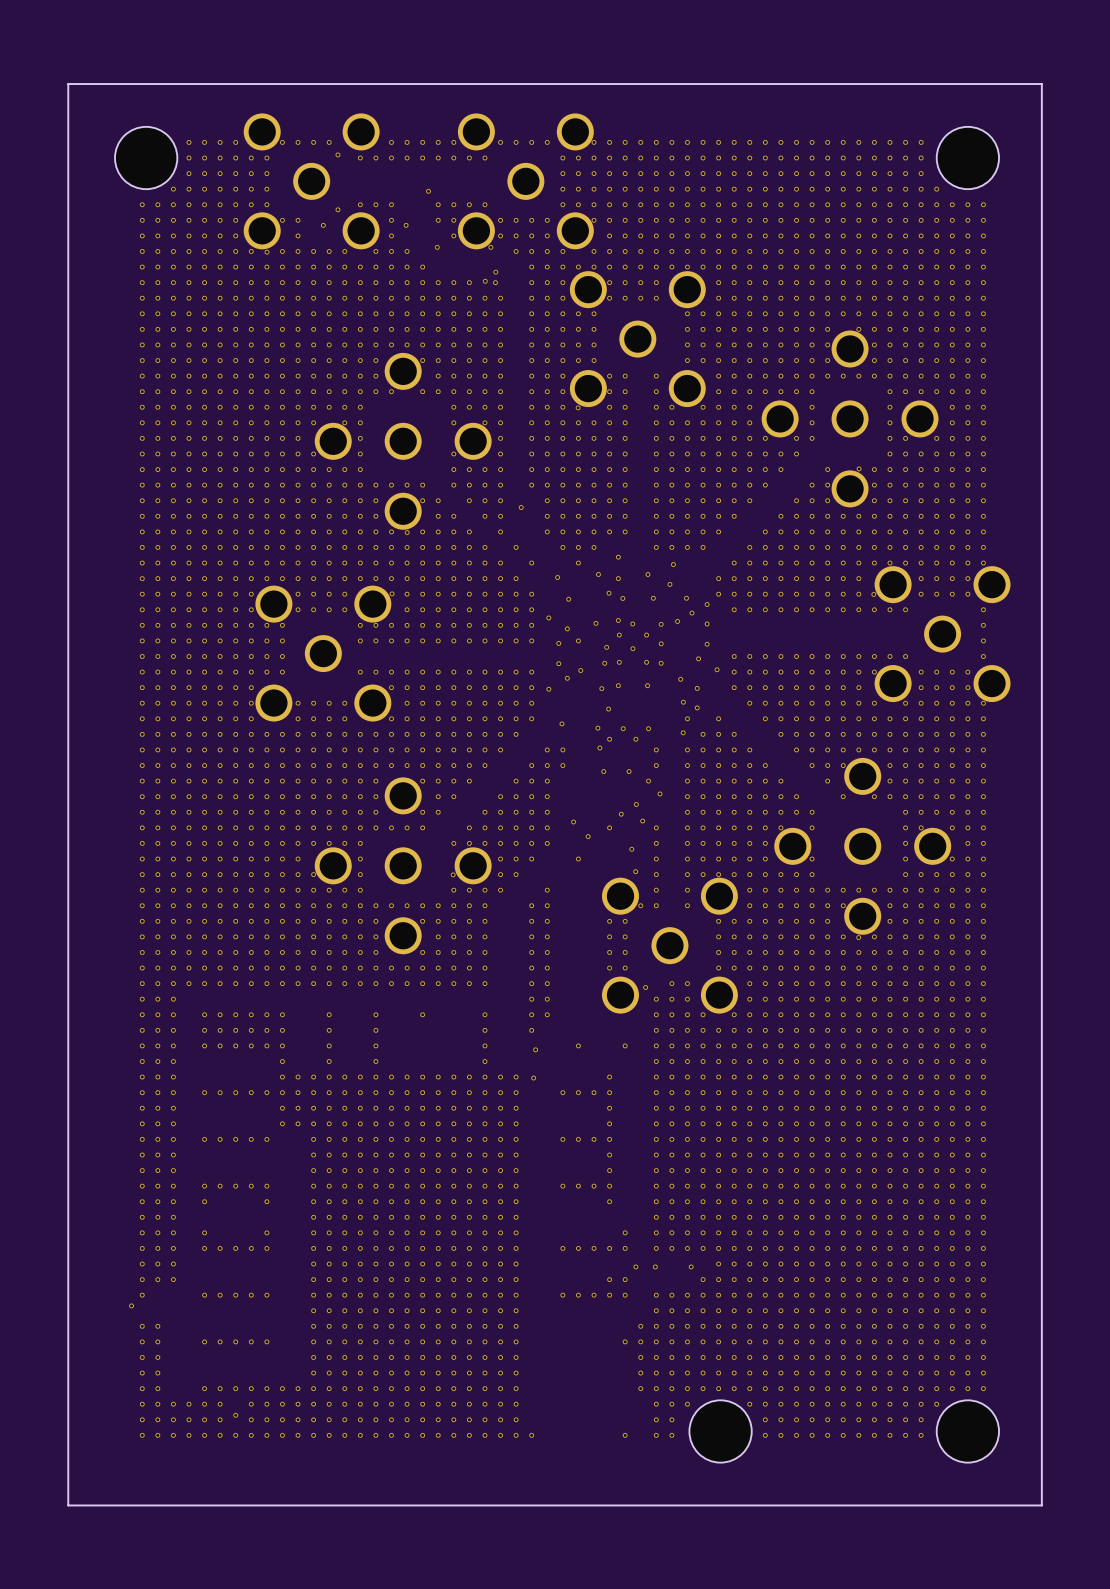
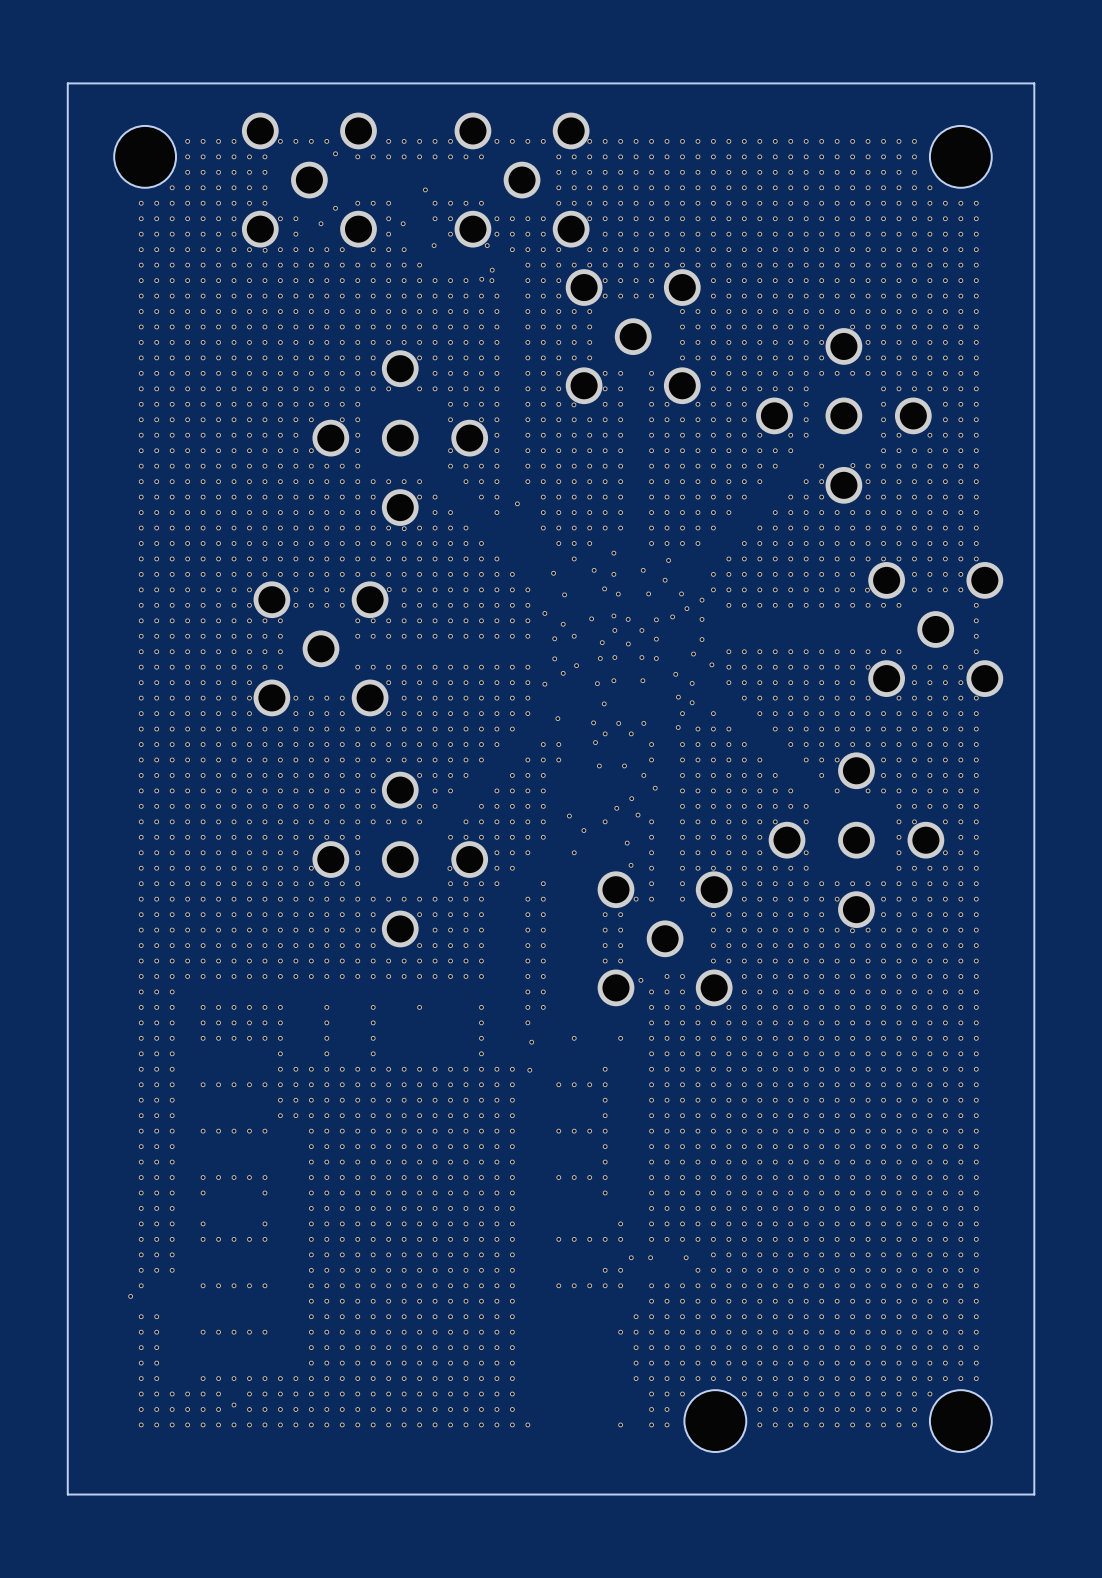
via: (453, 485) -> none
via: (469, 500) -> none
via: (484, 516) -> none
via: (500, 531) -> none
via: (516, 547) -> none
via: (531, 563) -> none

